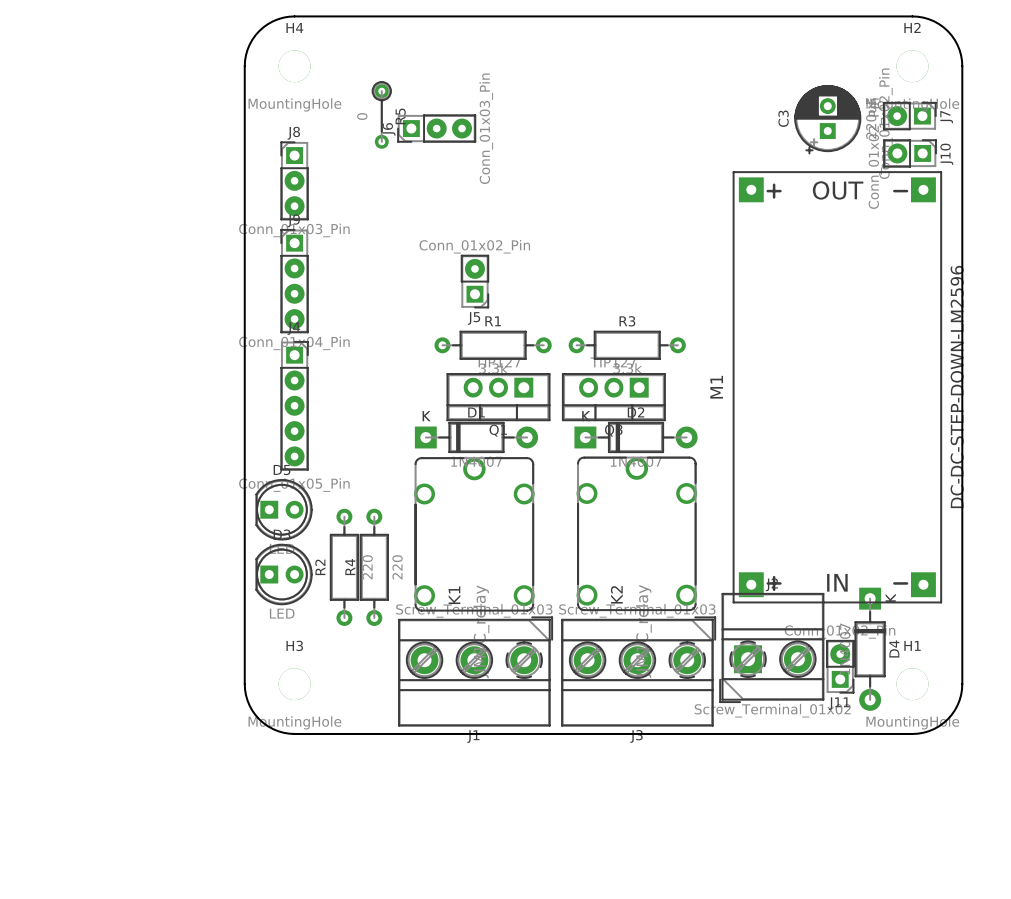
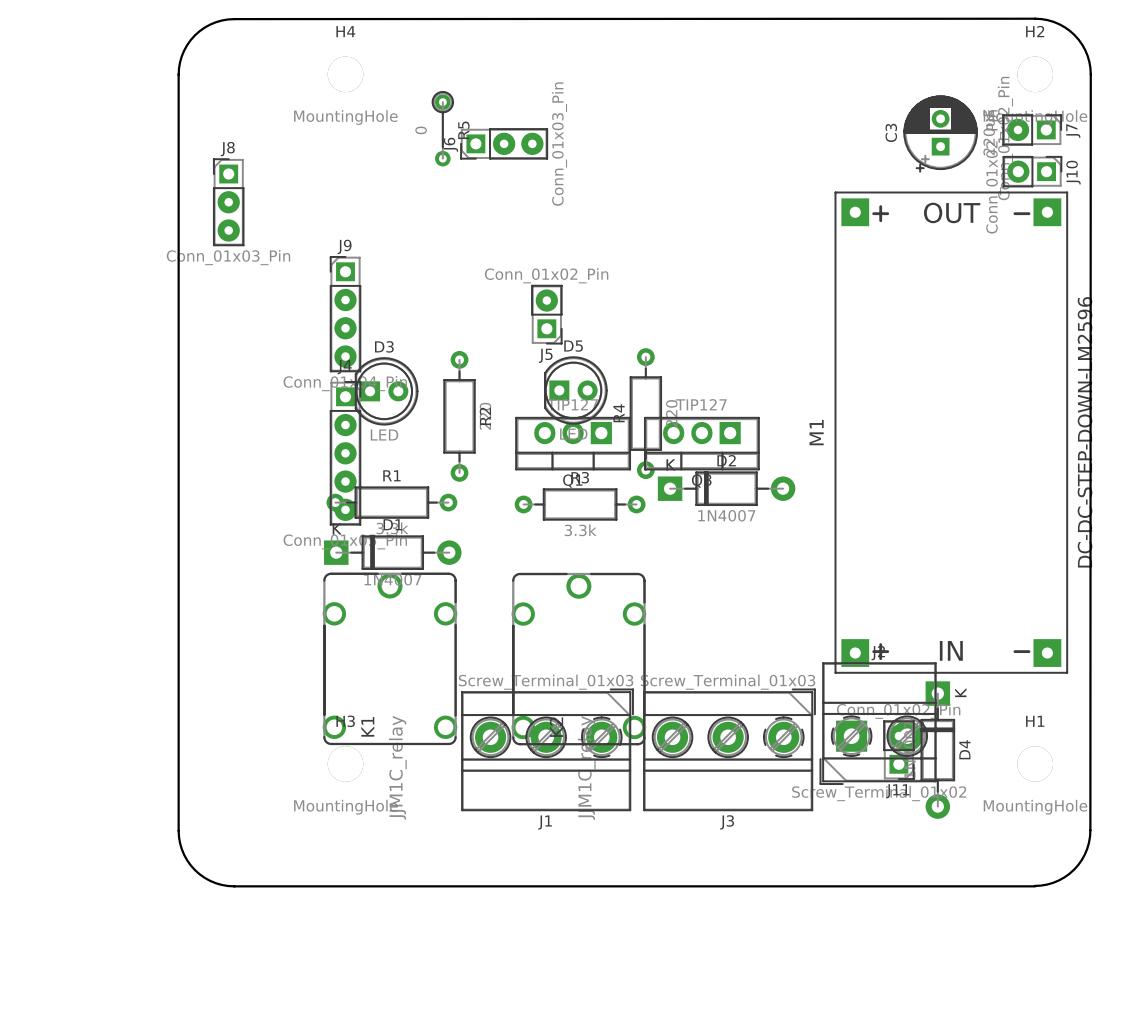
board edge: (912, 16) (294, 16) (272, 21) (259, 31) (249, 44) (244, 66) (244, 684) (247, 700) (259, 719) (278, 731) (294, 733) (912, 733) (928, 731) (947, 719) (959, 700) (962, 684) (962, 66) -> (1034, 885) (1053, 882) (1069, 873) (1081, 859) (1090, 836) (1090, 74)
board edge: none -> (1035, 18) (228, 19) (210, 24) (190, 40) (181, 56) (178, 74)
board edge: none -> (178, 74) (178, 830) (181, 849) (194, 870) (210, 880) (234, 886) (1035, 886)
J8 position: (294, 180) -> (228, 202)
R1 position: (493, 345) -> (391, 502)
R3 position: (627, 345) -> (580, 504)
D1 position: (476, 437) -> (392, 552)
D5 position: (284, 509) -> (575, 390)
K2 position: (636, 533) -> (578, 659)
K1 position: (474, 534) -> (390, 658)
R2 name position: R2 (320, 567) -> R2 (485, 416)
R2 position: (344, 567) -> (459, 416)
R4 position: (374, 567) -> (645, 413)
D3 position: (284, 574) -> (386, 391)
D4 position: (870, 649) -> (937, 750)
J11 position: (840, 666) -> (898, 750)

